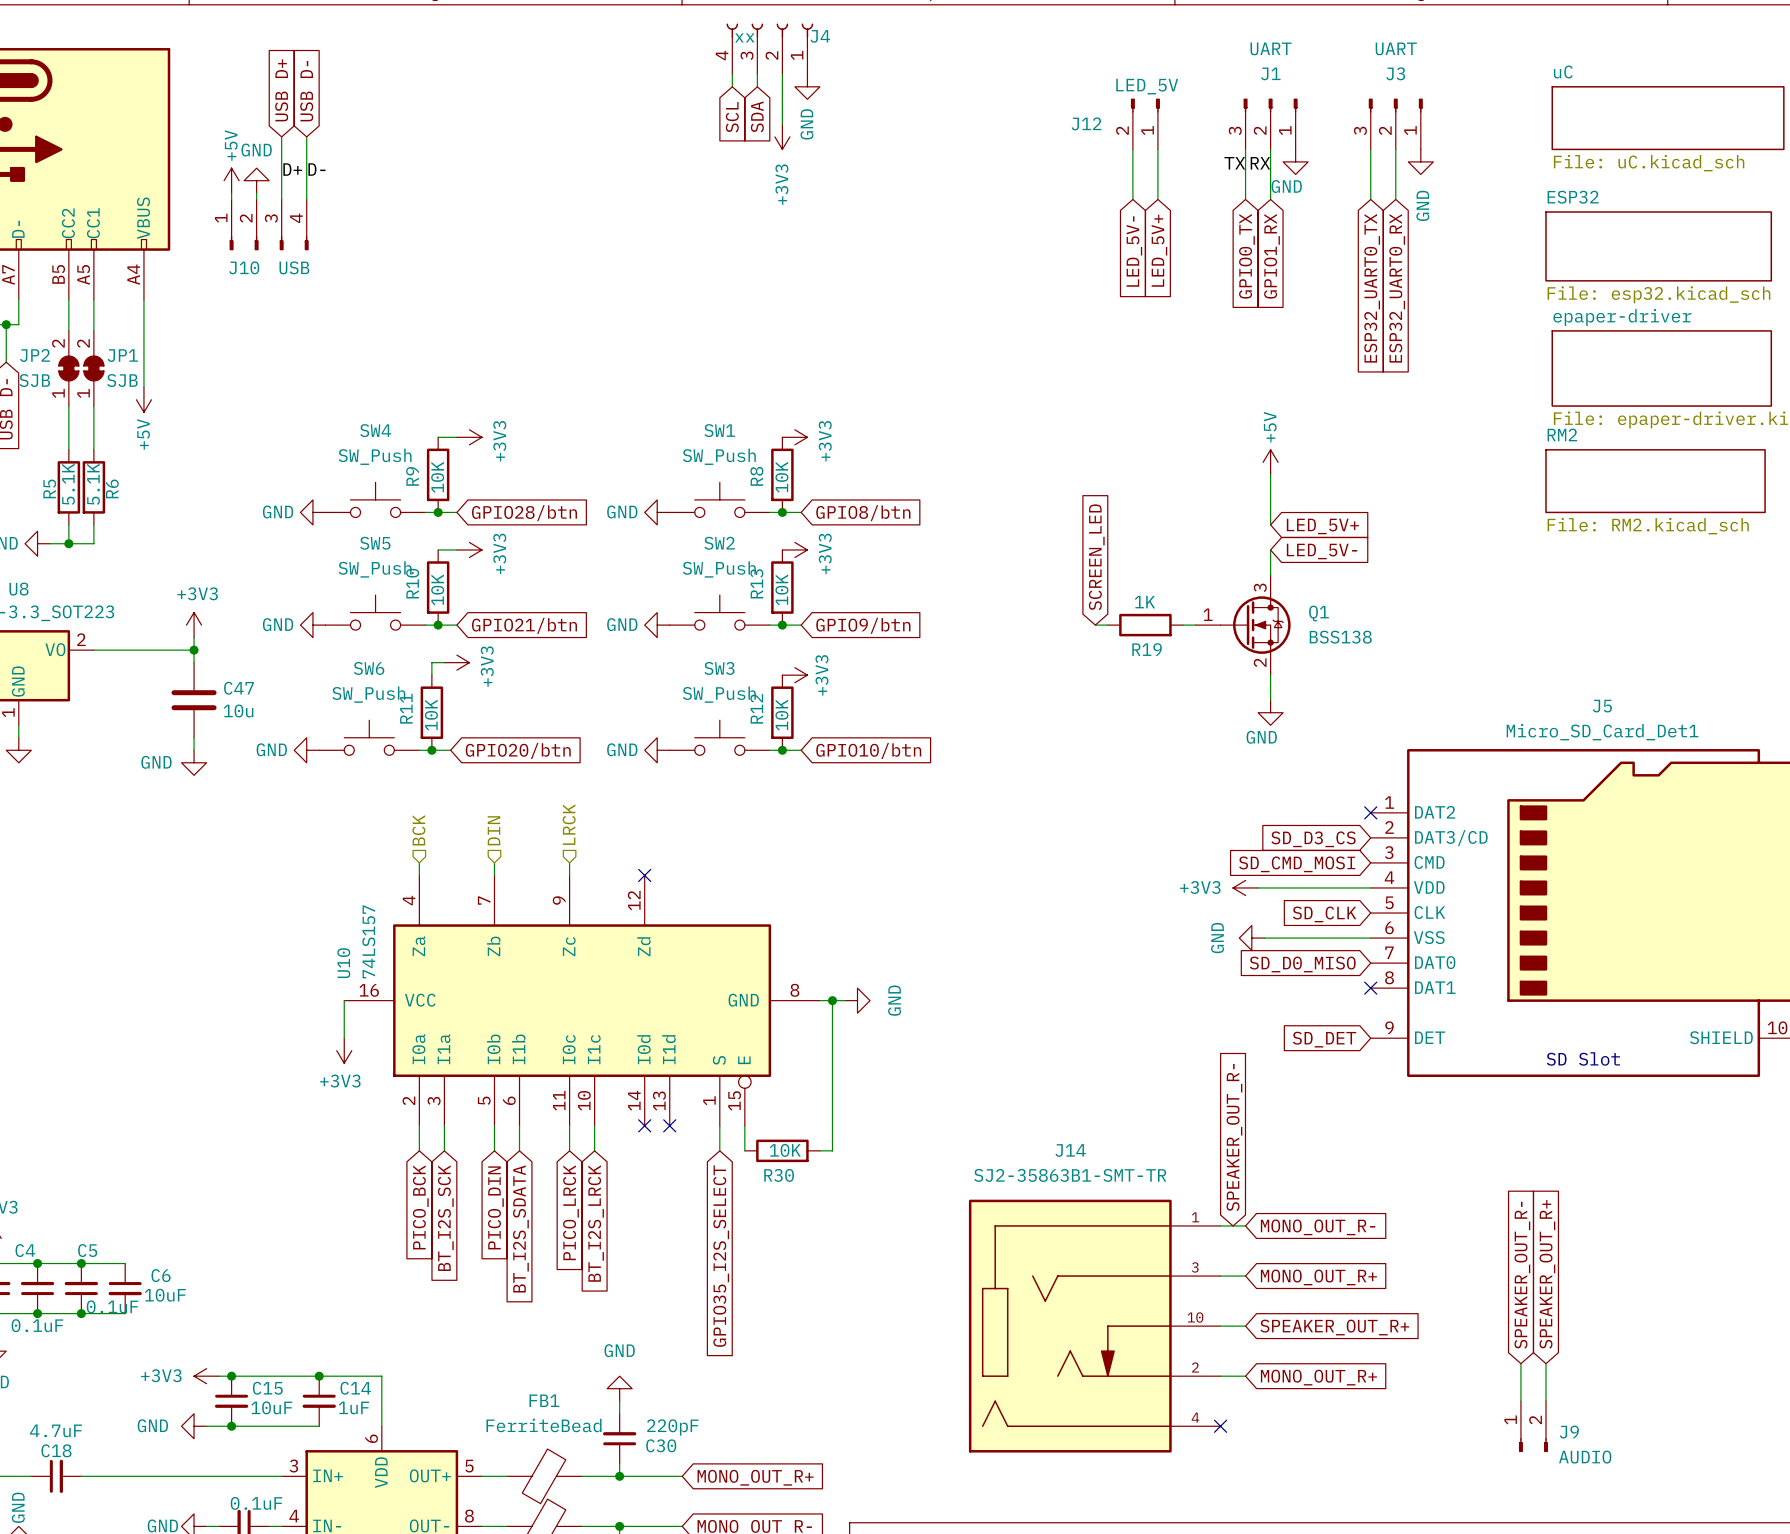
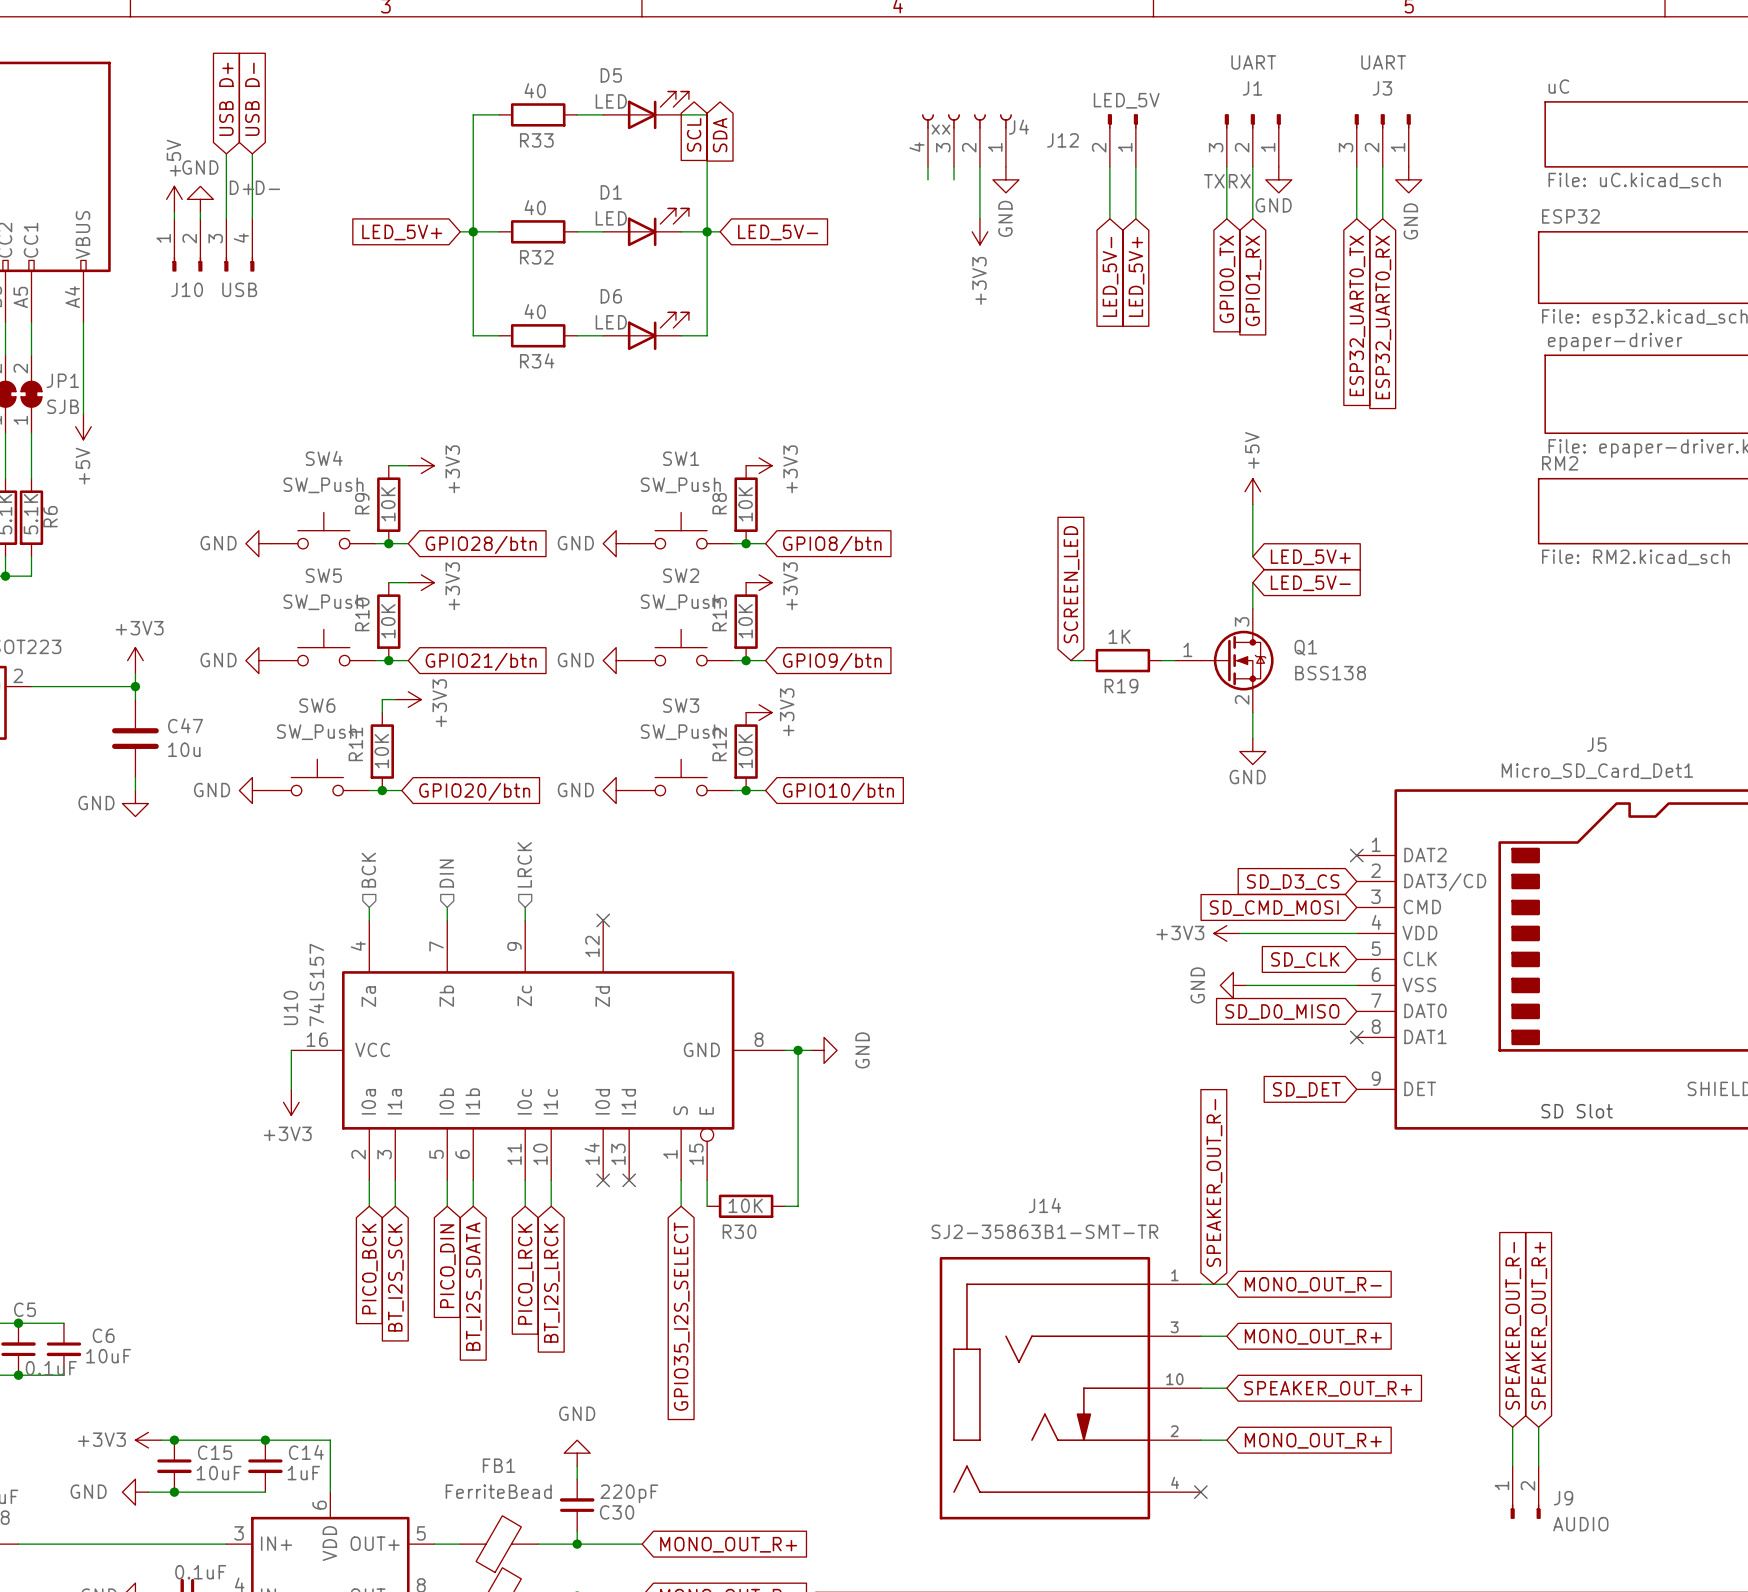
J4 position: (769, 48) -> (966, 140)
wire: (732, 74) (732, 86) -> (927, 166) (927, 179)
wire: (757, 74) (757, 86) -> (953, 166) (953, 179)
wire: (782, 74) (782, 124) -> (979, 166) (979, 218)
power symbol position: GND (807, 86) -> GND (1005, 179)
D5: none -> LED (646, 110)
wire: none -> (499, 114) (473, 114) (473, 335) (499, 335)
R33: none -> 40 (538, 114)
wire: none -> (577, 114) (603, 114)
wire: none -> (681, 114) (707, 114) (707, 335) (681, 335)
power symbol position: +3V3 (782, 136) -> +3V3 (979, 231)
D1: none -> LED (646, 227)
wire: none -> (460, 231) (499, 231)
junction: none -> (473, 231)
R32: none -> 40 (538, 231)
wire: none -> (577, 231) (603, 231)
wire: none -> (681, 231) (720, 231)
junction: none -> (707, 231)
global label: none -> LED_5V+ (402, 232)
global label: none -> LED_5V- (778, 232)
D6: none -> LED (646, 331)
R34: none -> 40 (538, 335)
wire: none -> (577, 335) (603, 335)

